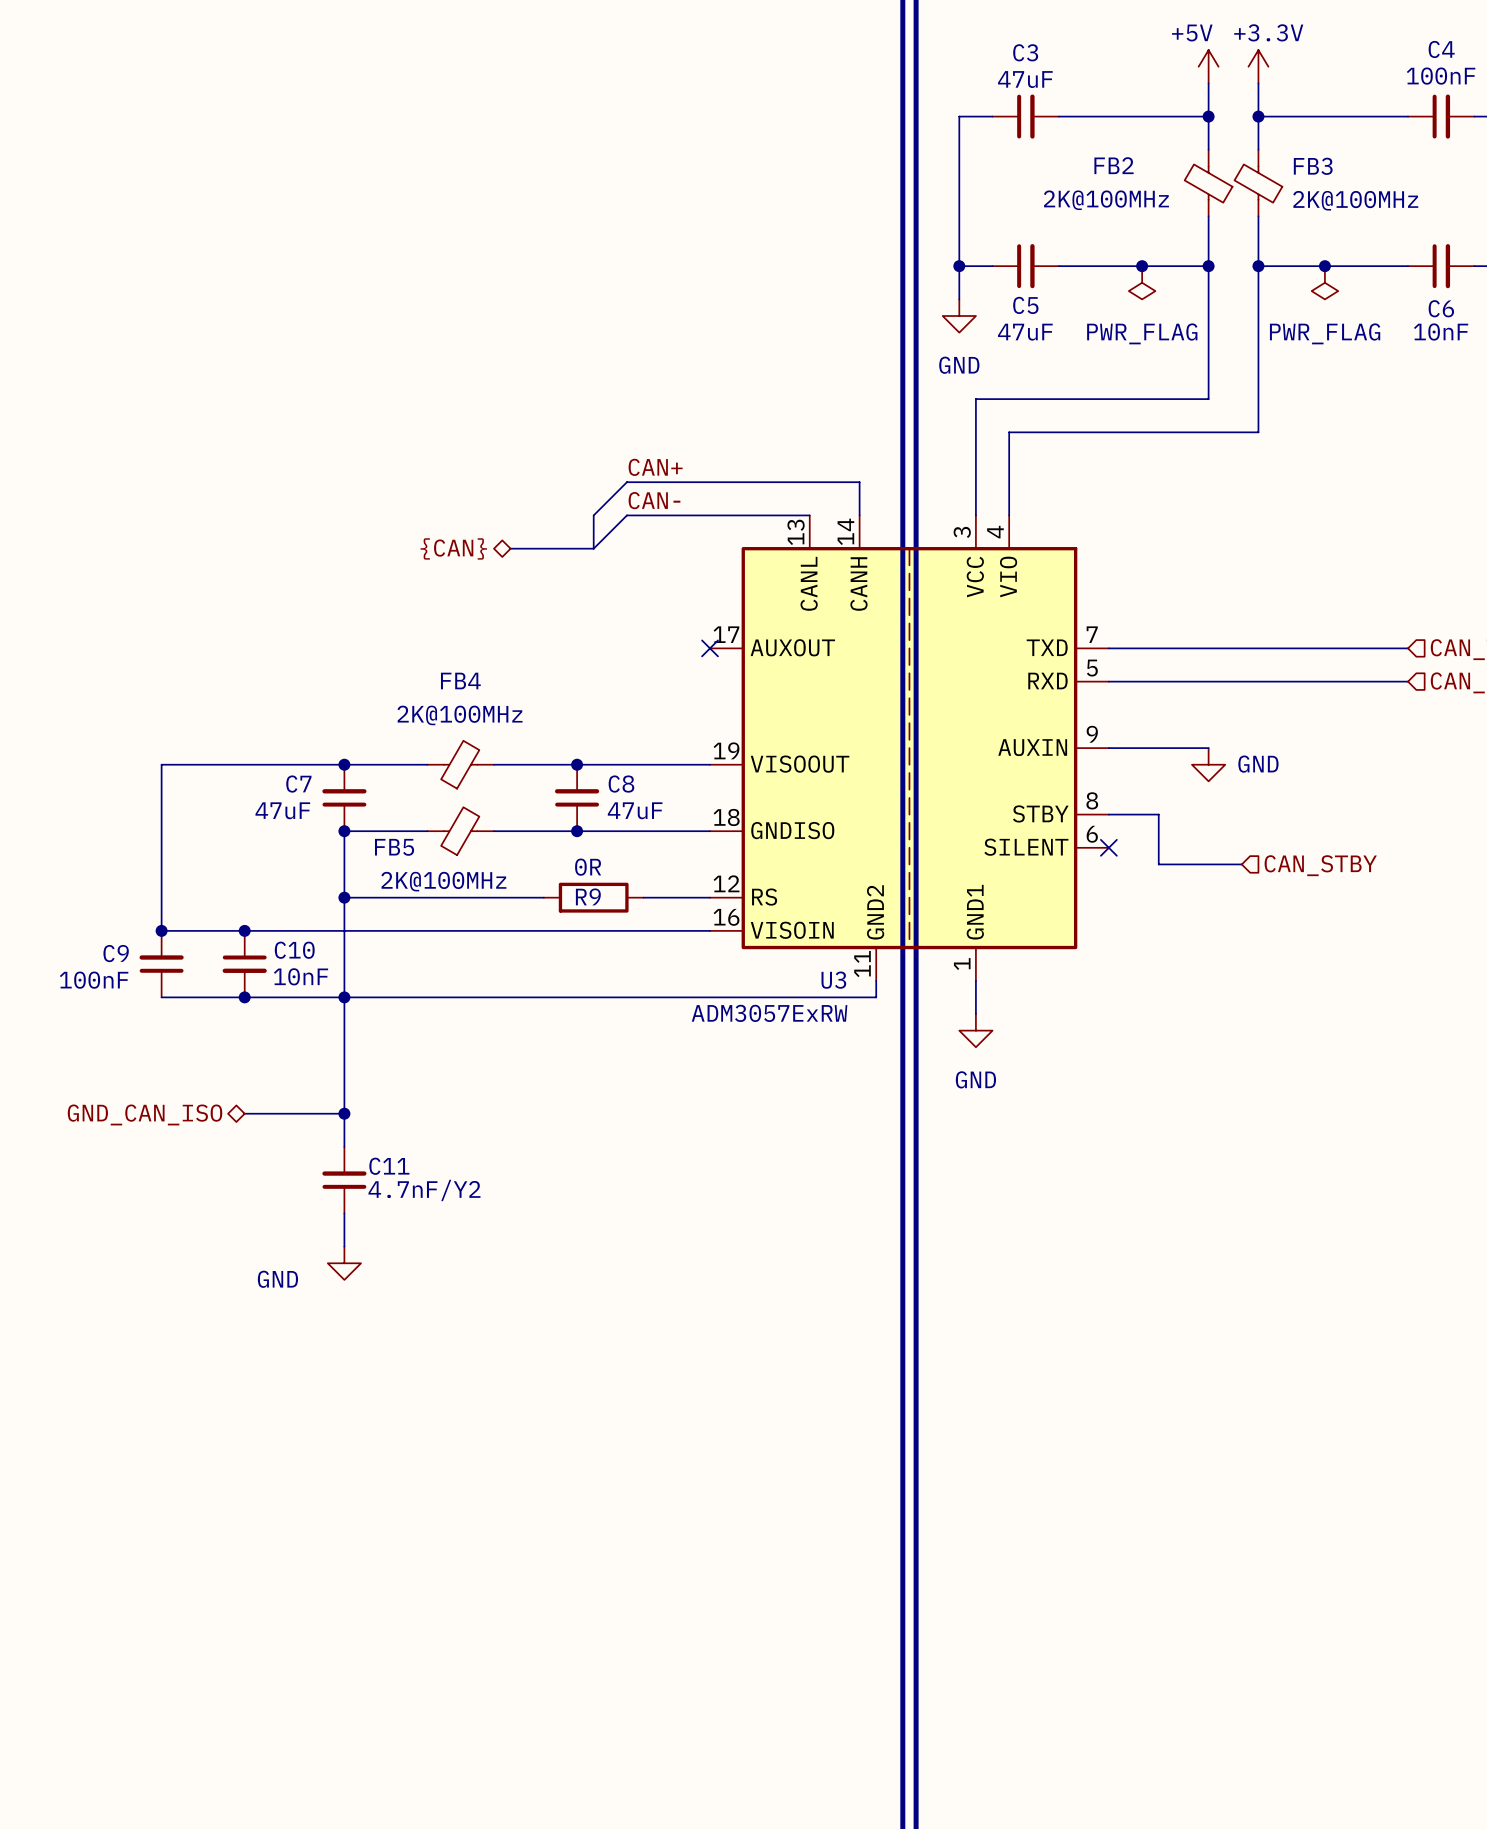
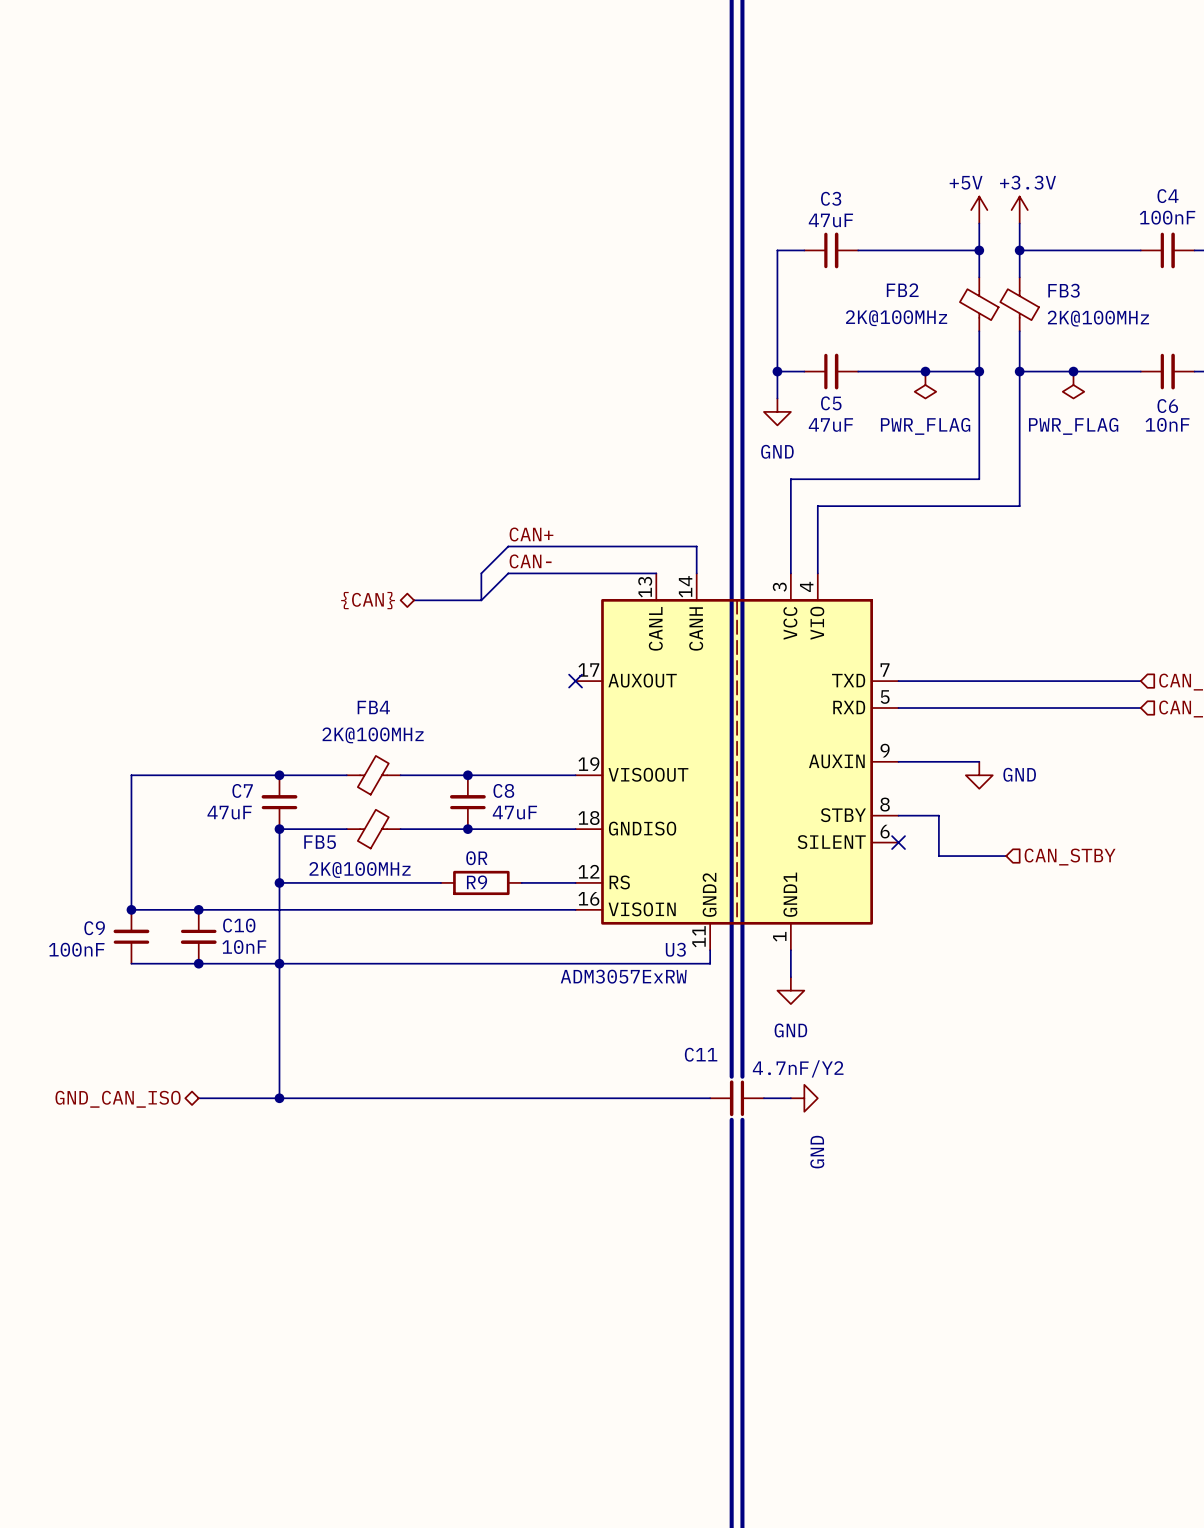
wire: (244, 1113) (344, 1113) -> none
junction position: (344, 1113) -> (279, 1098)
hierarchical label position: GND_CAN_ISO (145, 1114) -> GND_CAN_ISO (118, 1099)
line: (902, 1136) (902, 1190) -> none
line: (916, 1136) (916, 1190) -> none
wire: none -> (198, 1098) (710, 1098)
wire: none -> (763, 1098) (790, 1098)
power symbol: none -> GND (804, 1098)
C11 name position: C11 (389, 1166) -> C11 (701, 1054)
C11 rotation: 0° (344, 1180) -> 90° counterclockwise (736, 1098)
C11 position: (344, 1180) -> (737, 1098)
C11 value position: 4.7nF/Y2 (424, 1190) -> 4.7nF/Y2 (798, 1068)
wire: (344, 1213) (344, 1246) -> none
power symbol: GND (344, 1263) -> none

